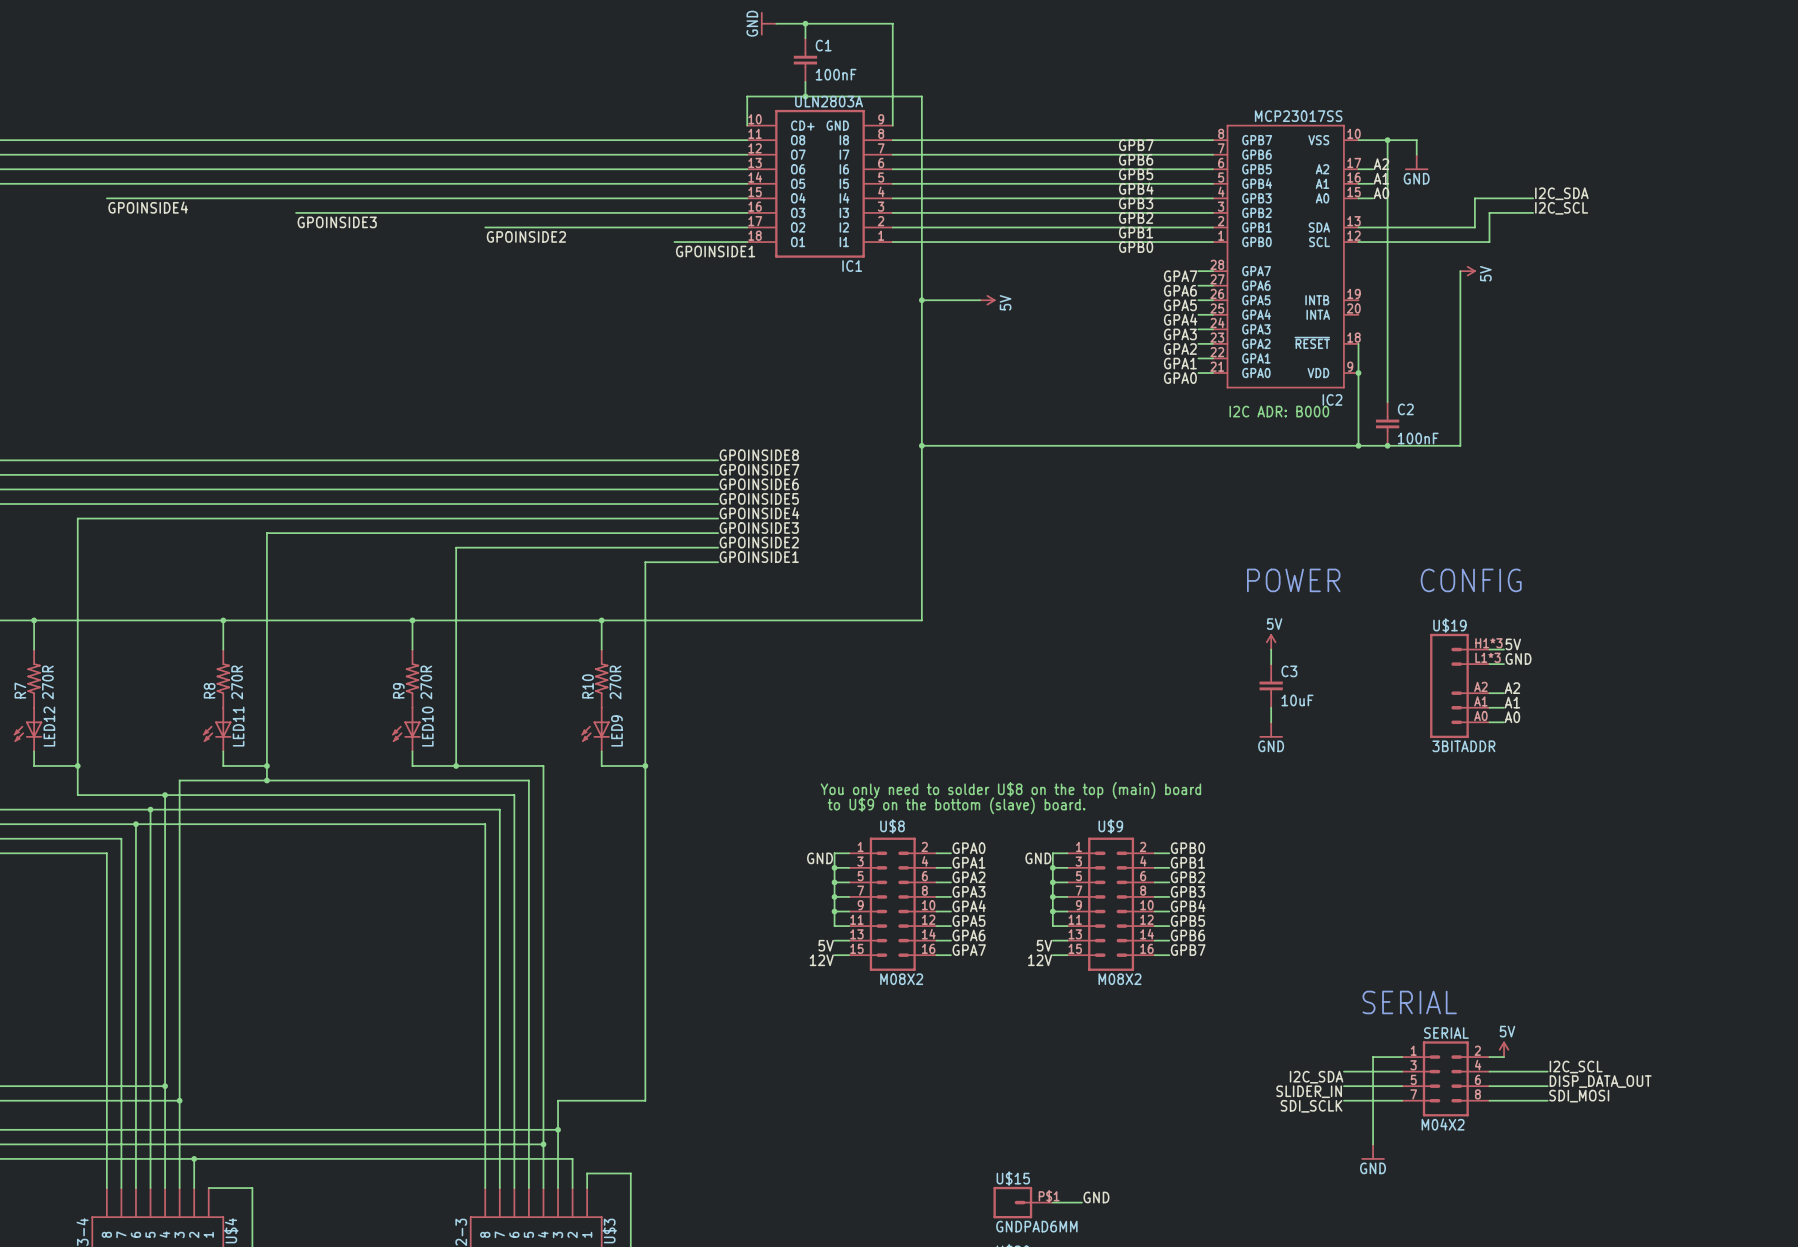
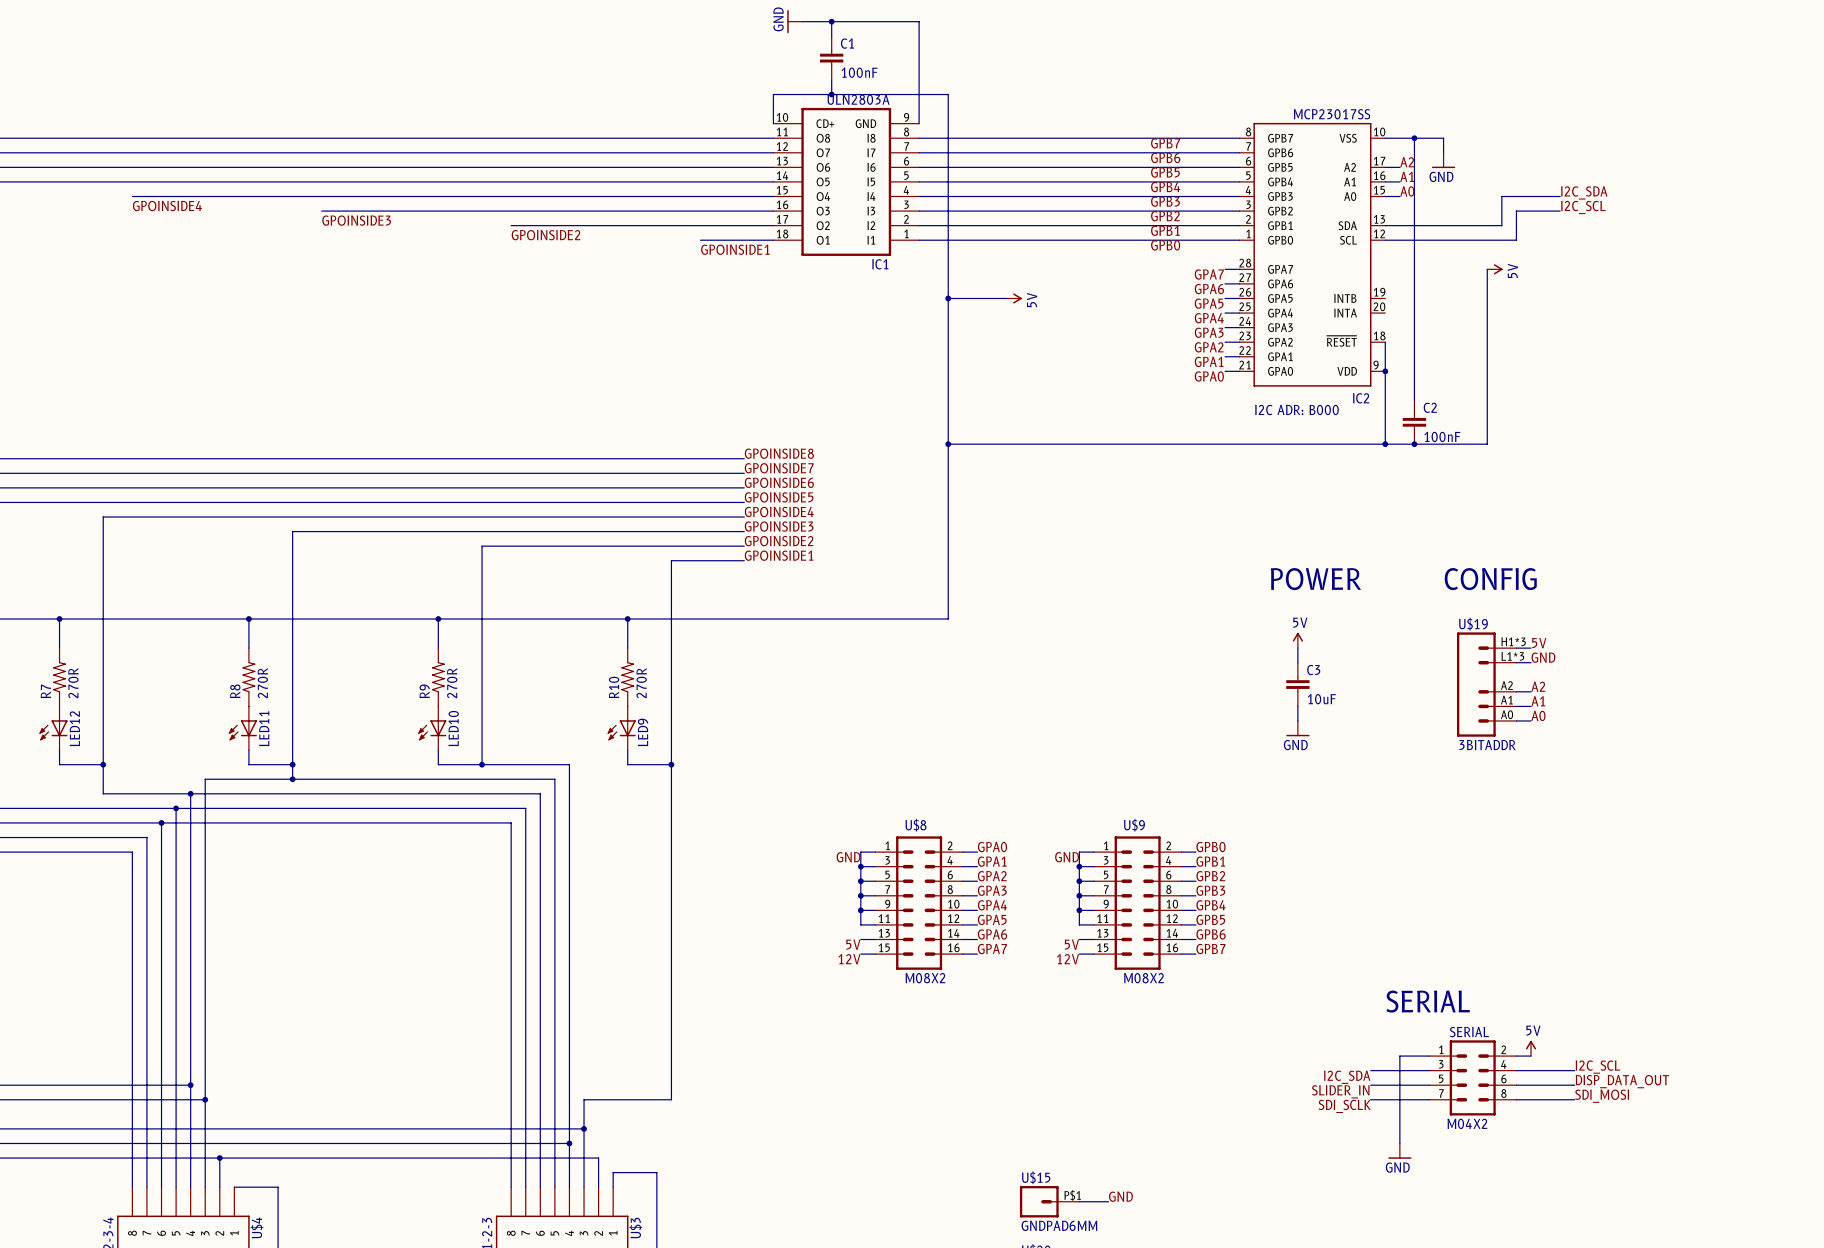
text: You only need to solder U$8 on the top (main) board (1010, 790) -> none
text: to U$9 on the bottom (slave) board. (956, 805) -> none

